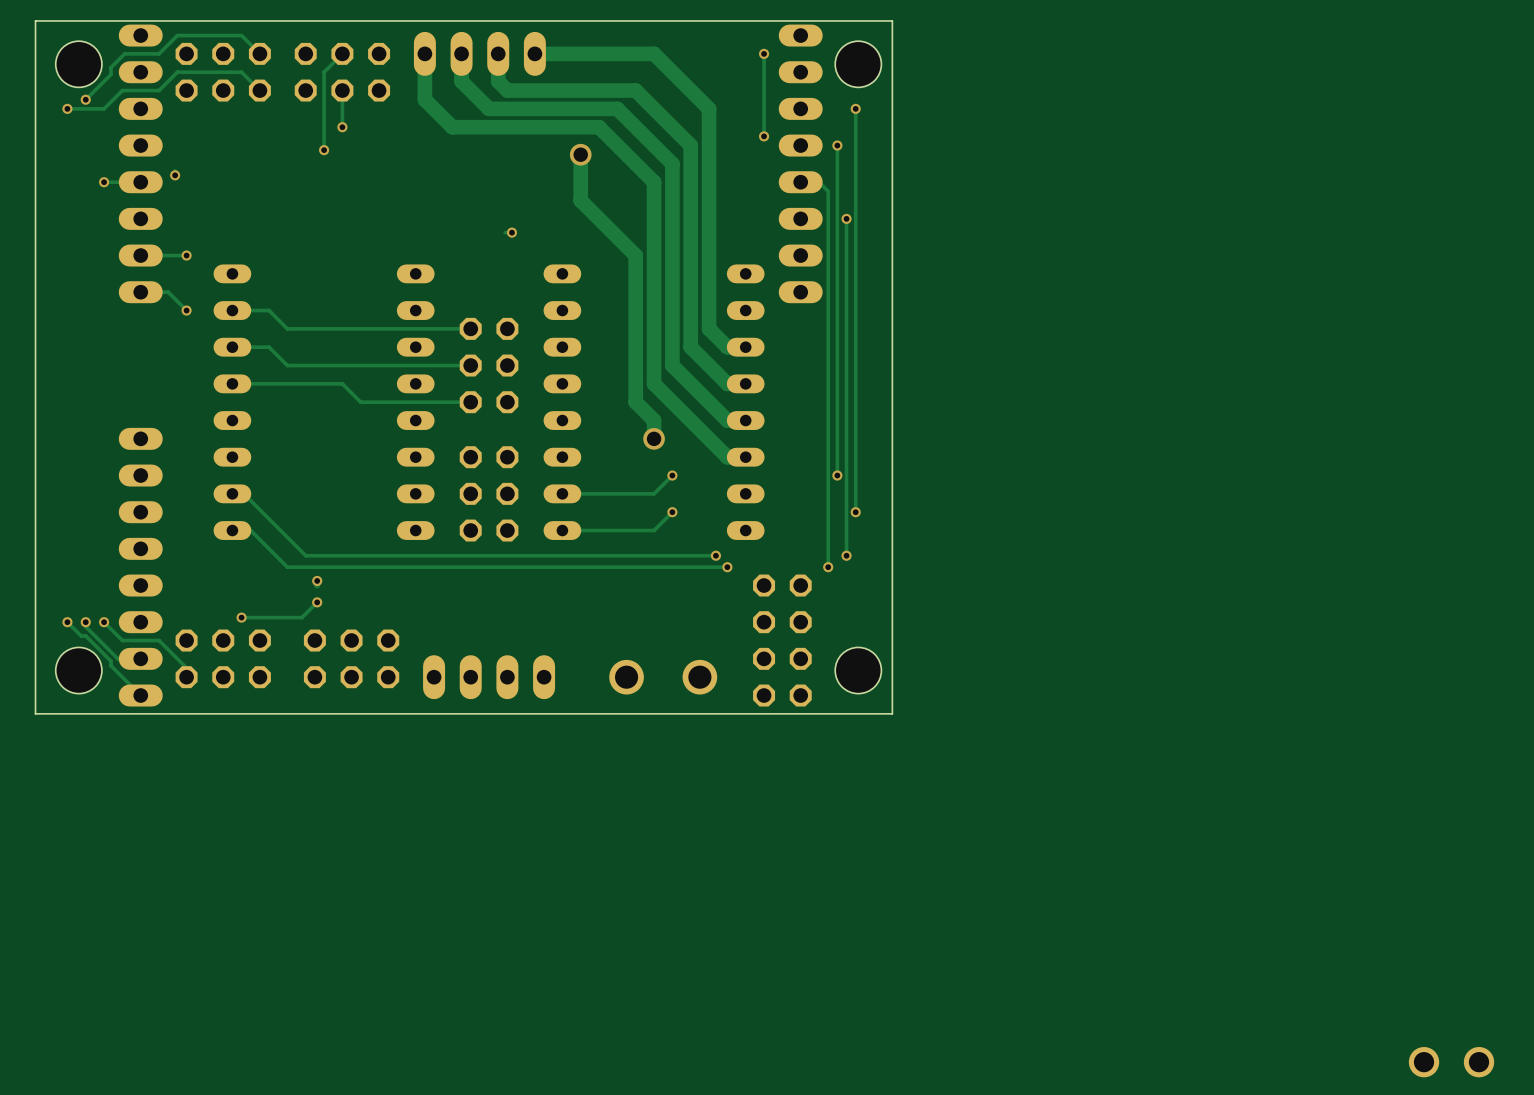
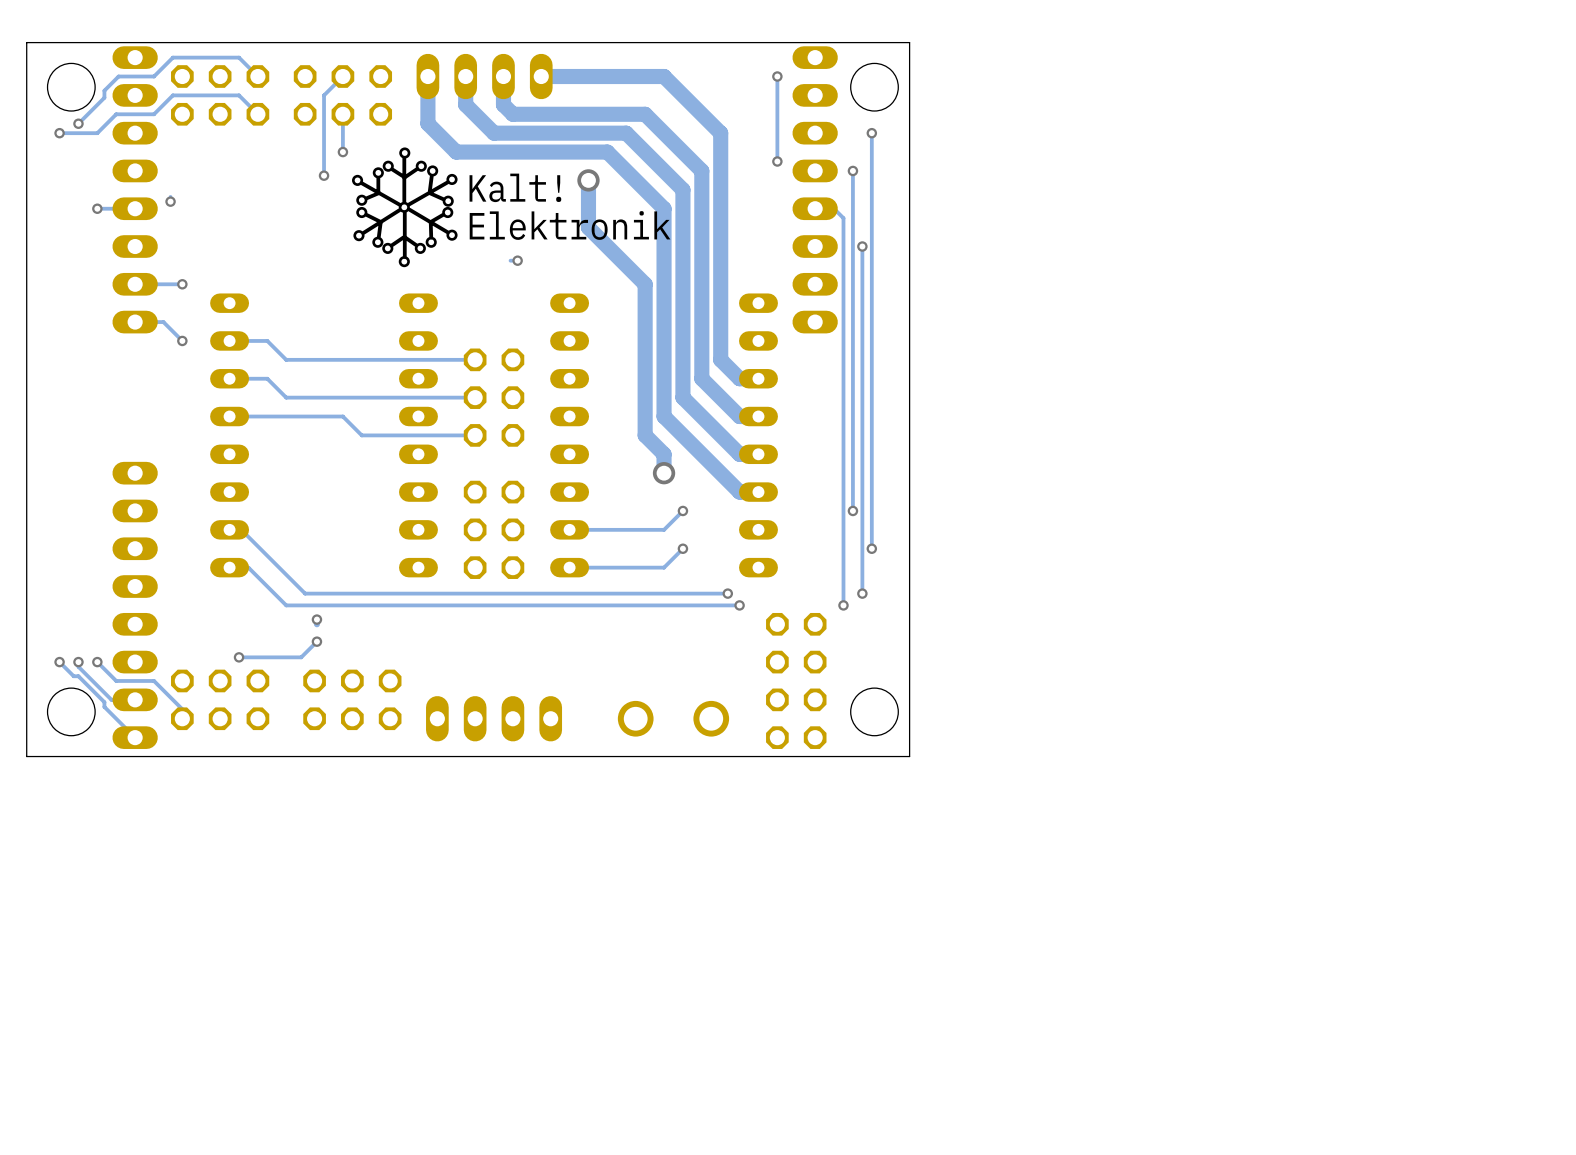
drawing: none -> [352, 147, 458, 268]
part: (1451, 1062) -> none

